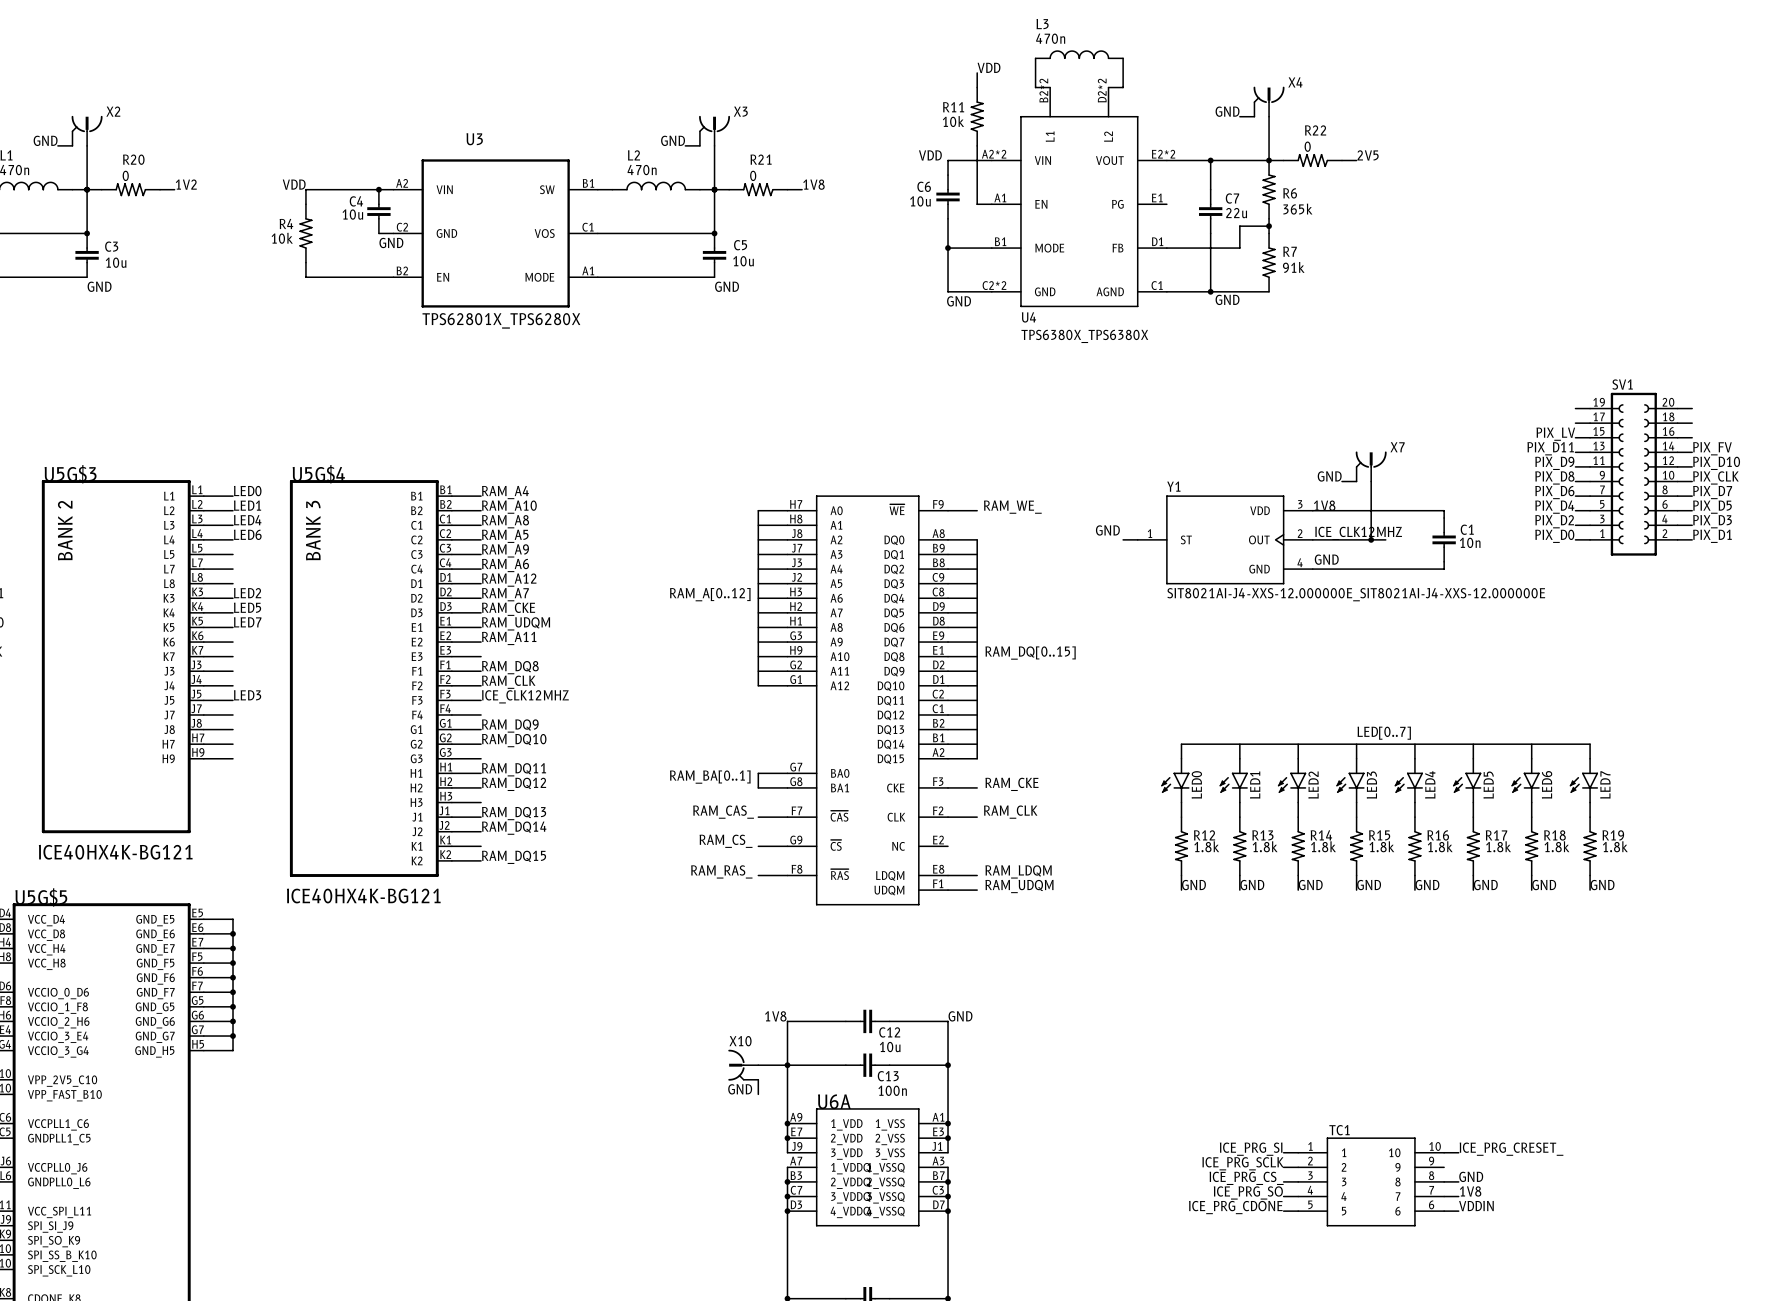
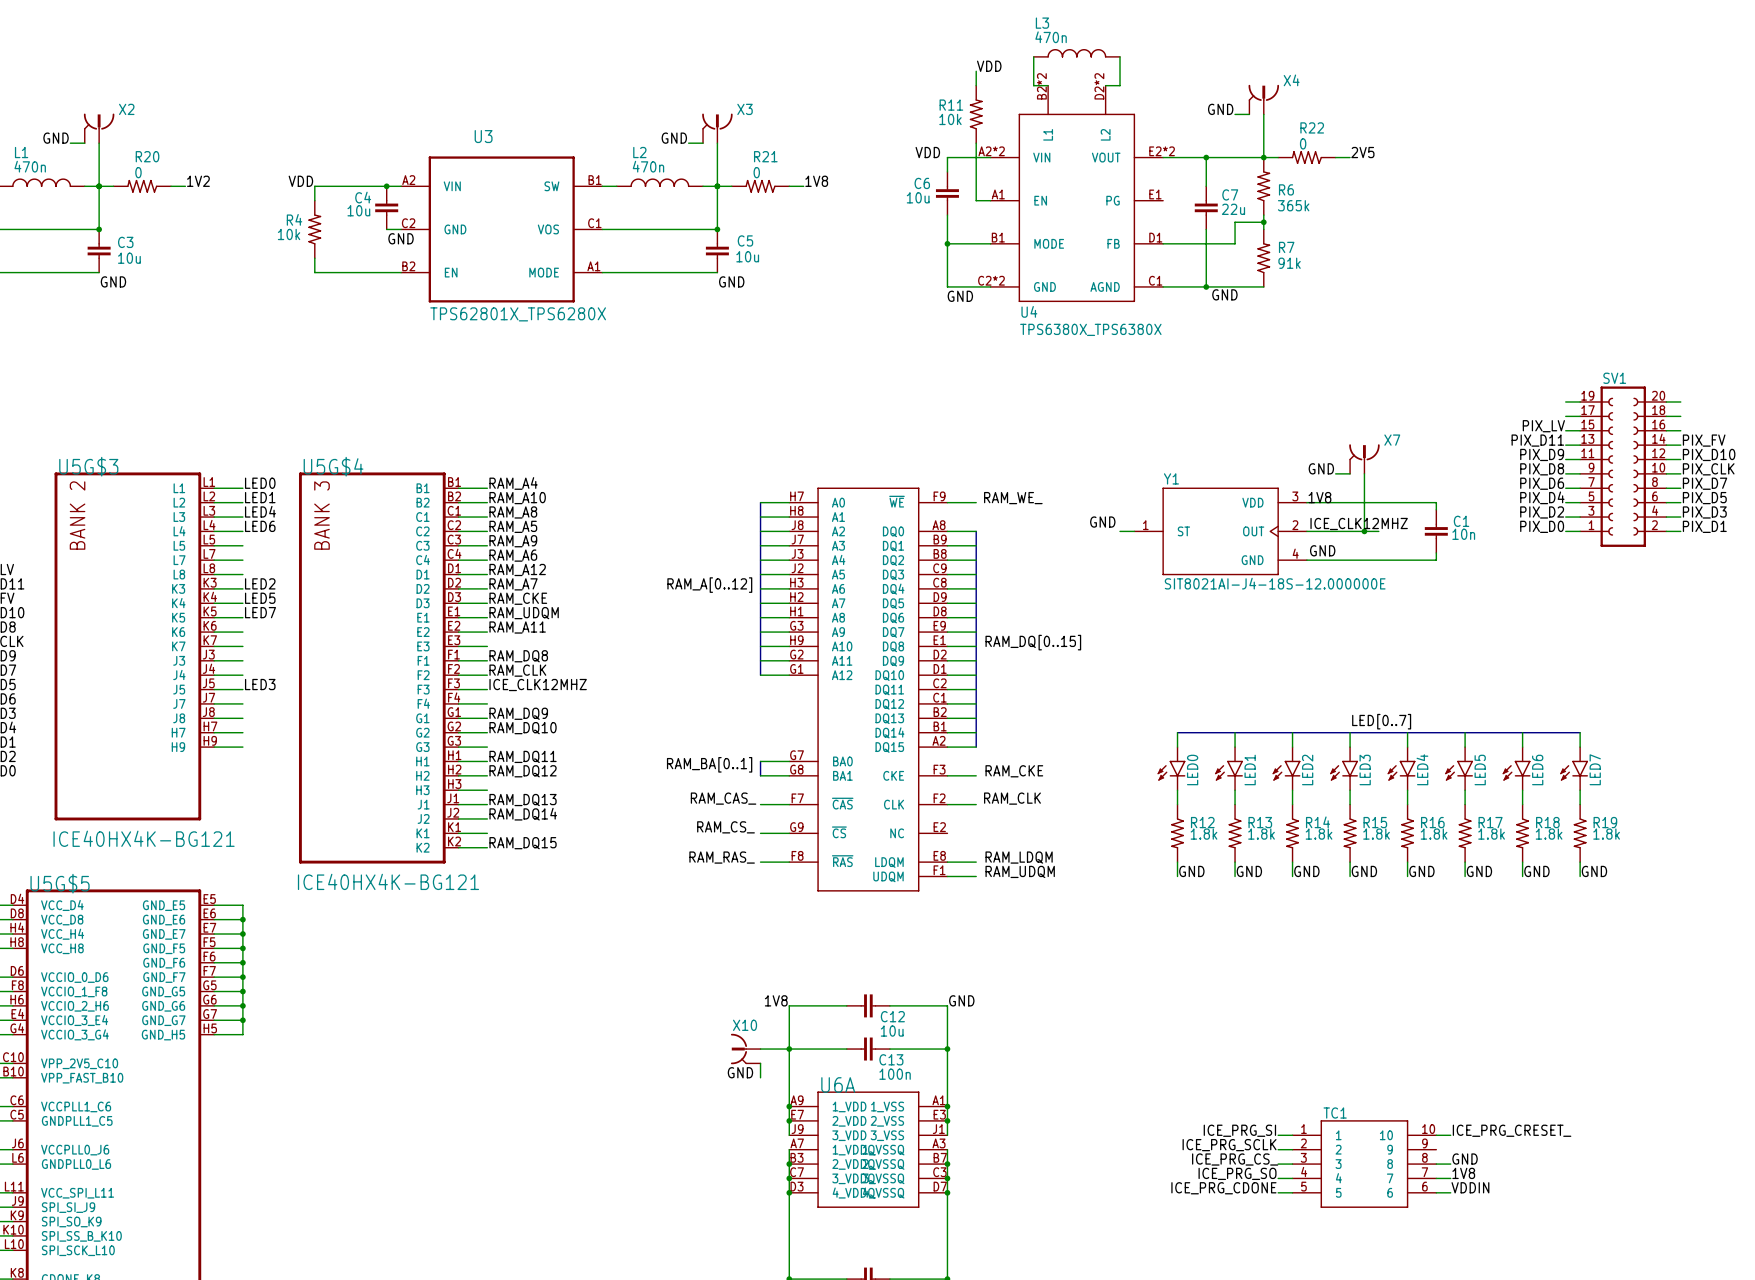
Y1 value: SIT8021AI-J4-XXS-12.000000E_SIT8021AI-J4-XXS-12.000000E (1356, 594) -> SIT8021AI-J4-18S-12.000000E (1275, 583)

